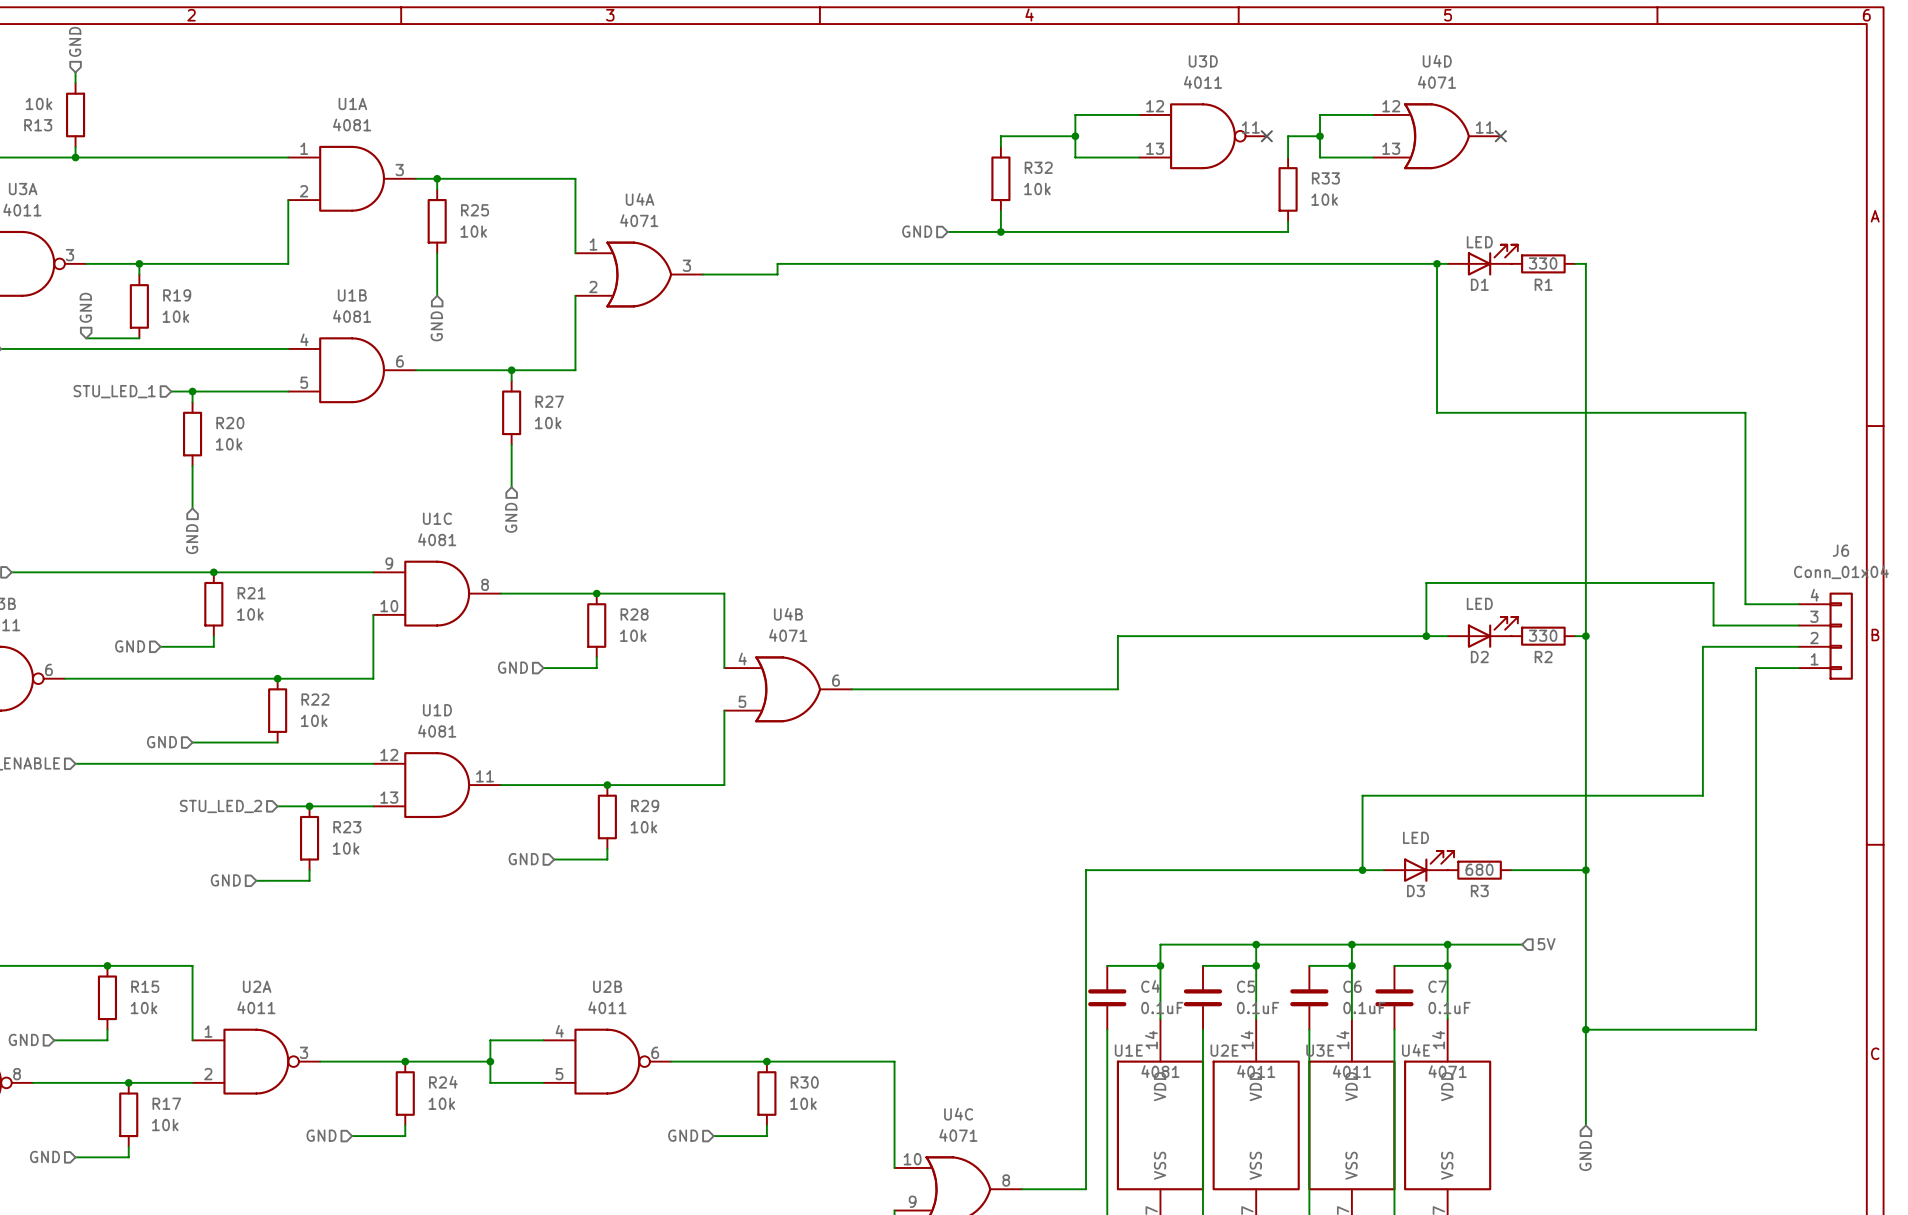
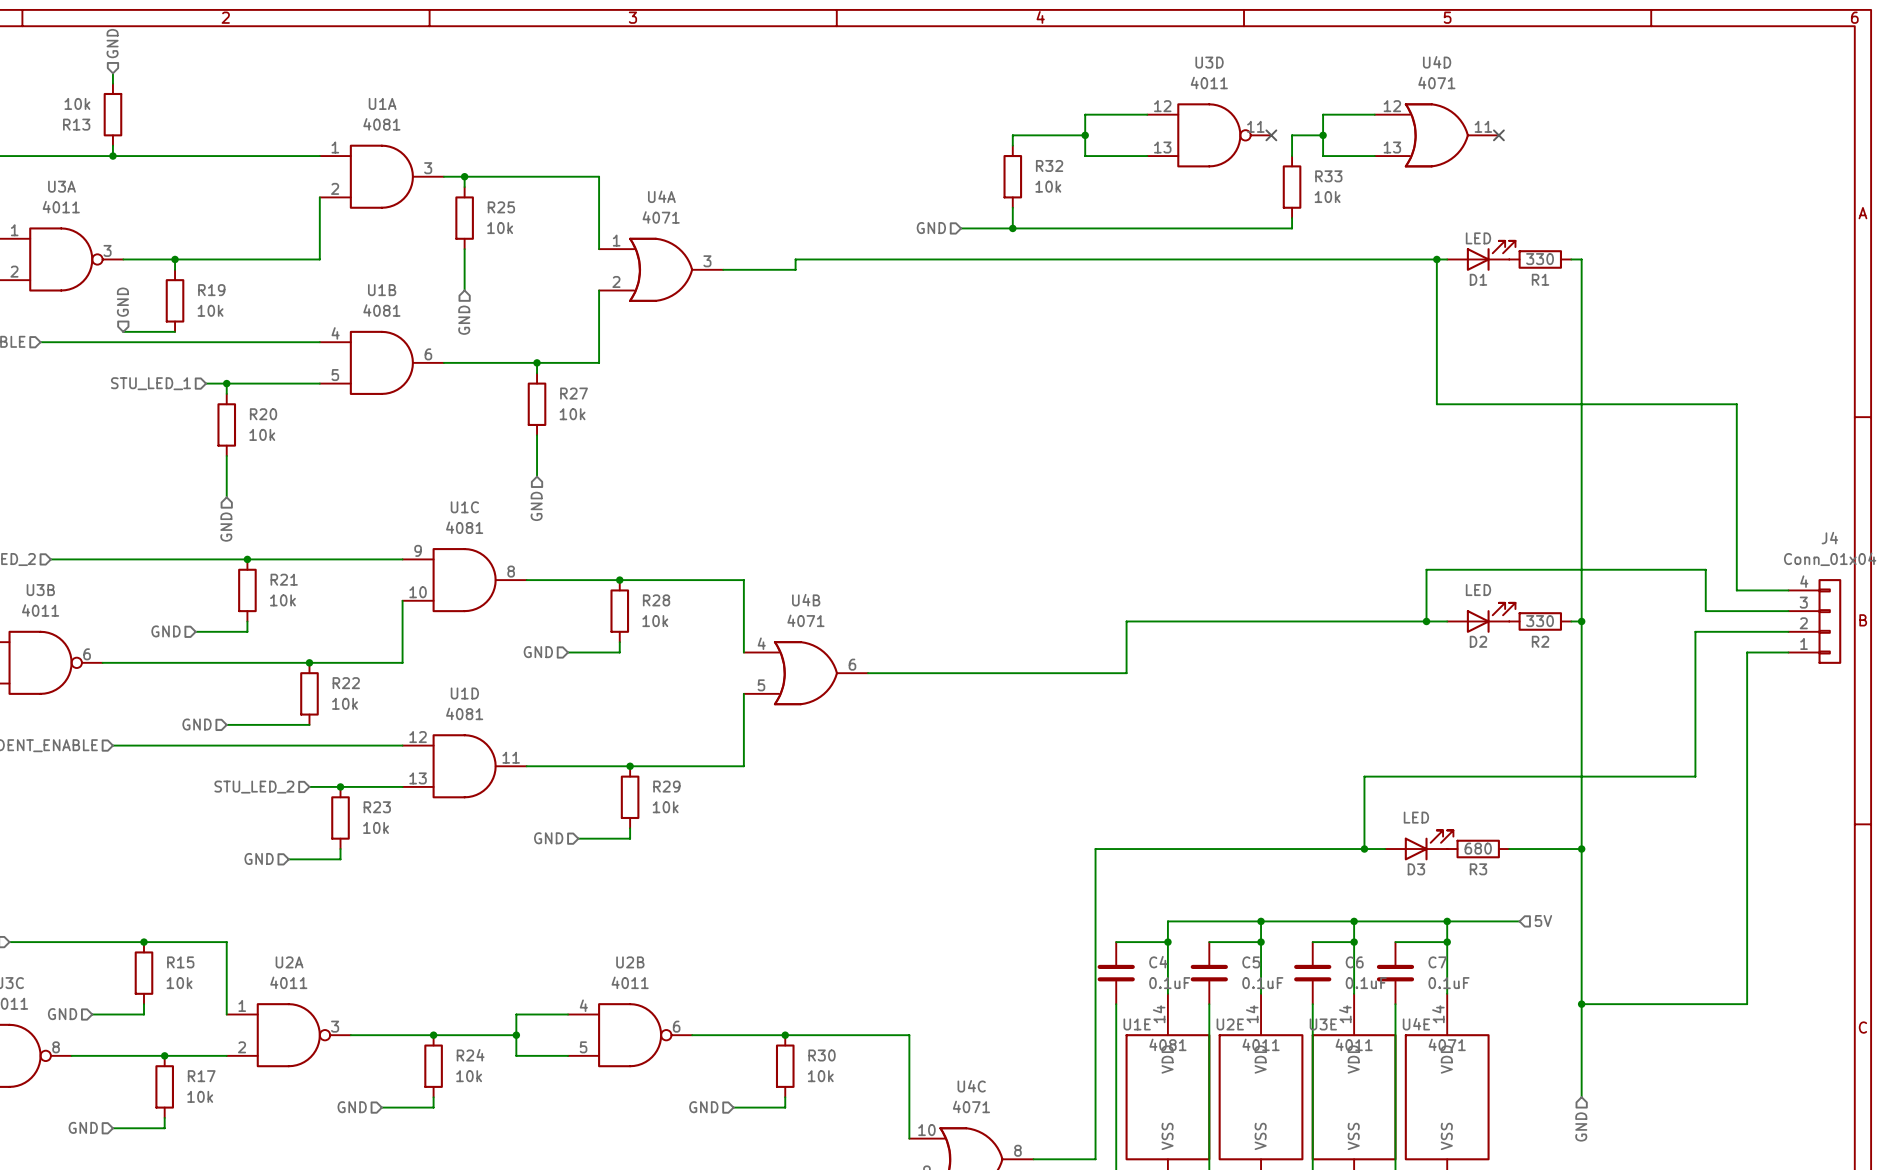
J6 name: J6 (1840, 550) -> J4 (1829, 538)

